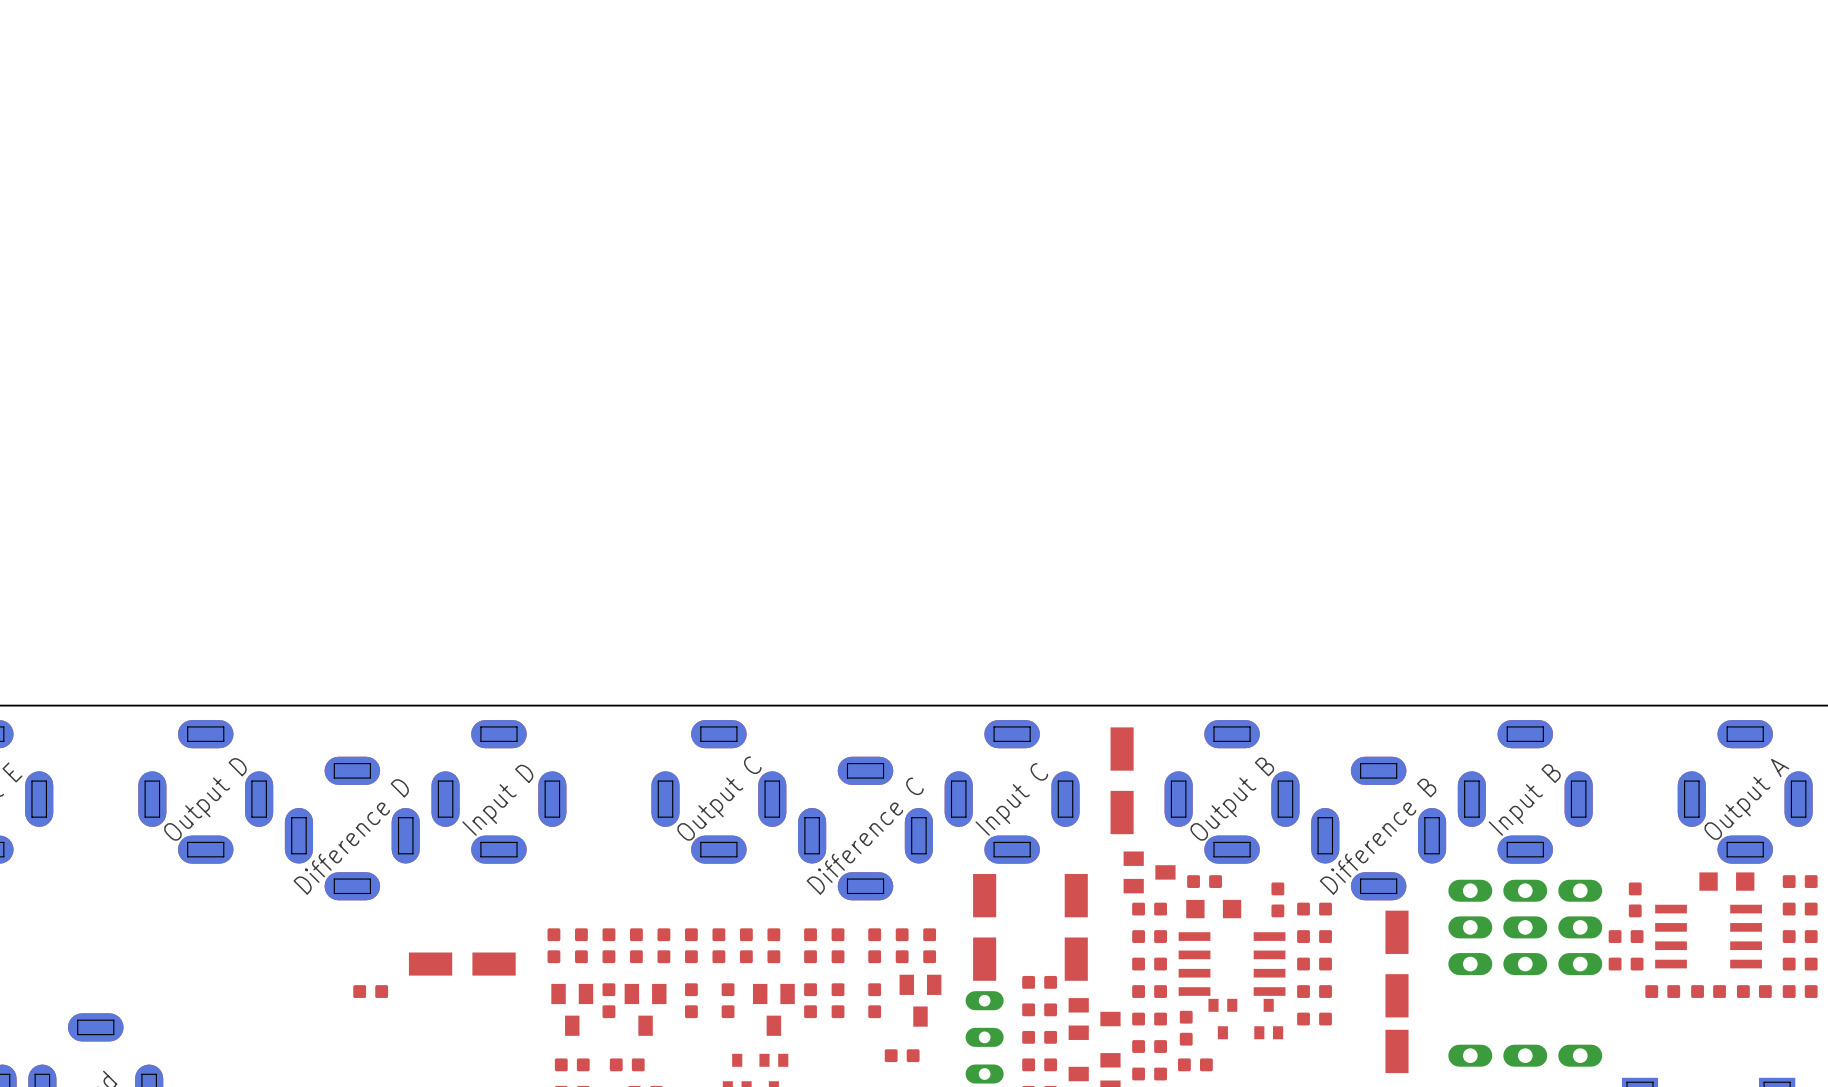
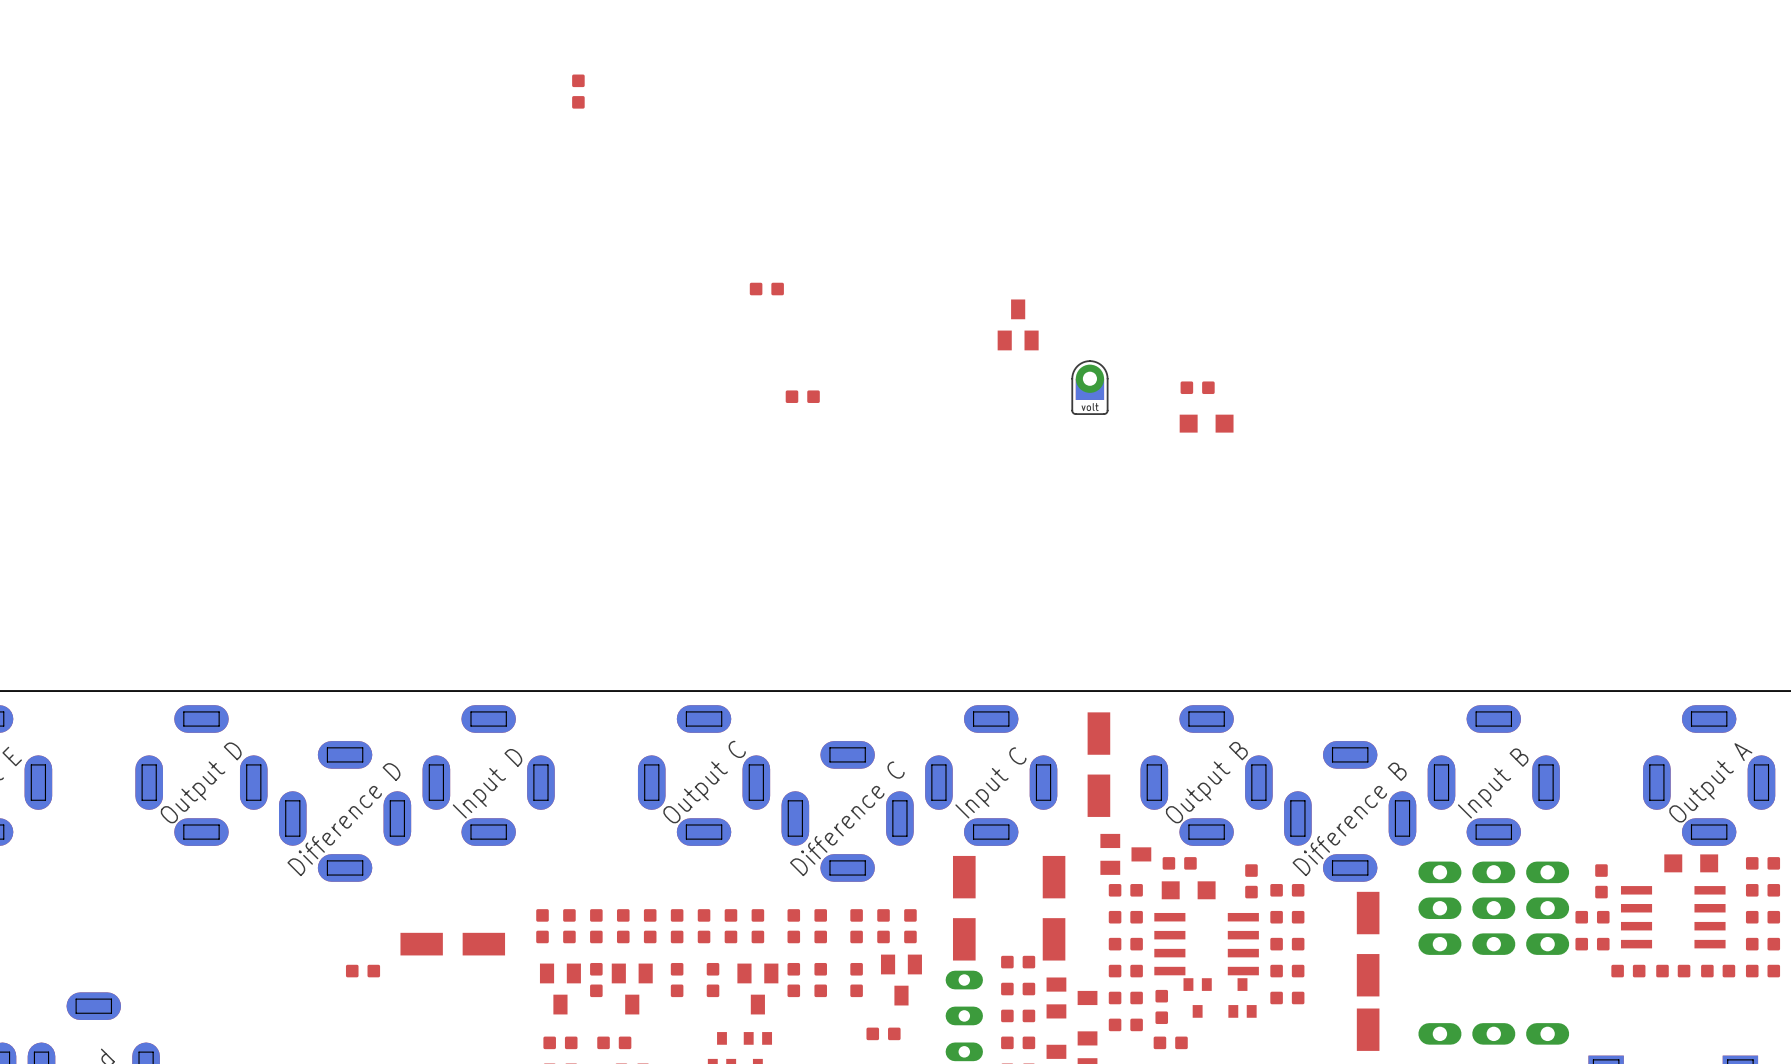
part: none -> (578, 91)
part: none -> (766, 289)
part: none -> (1018, 324)
part: none -> (1089, 387)
part: none -> (1197, 387)
part: none -> (802, 396)
part: none -> (1206, 423)
part: (1149, 1074) -> none

